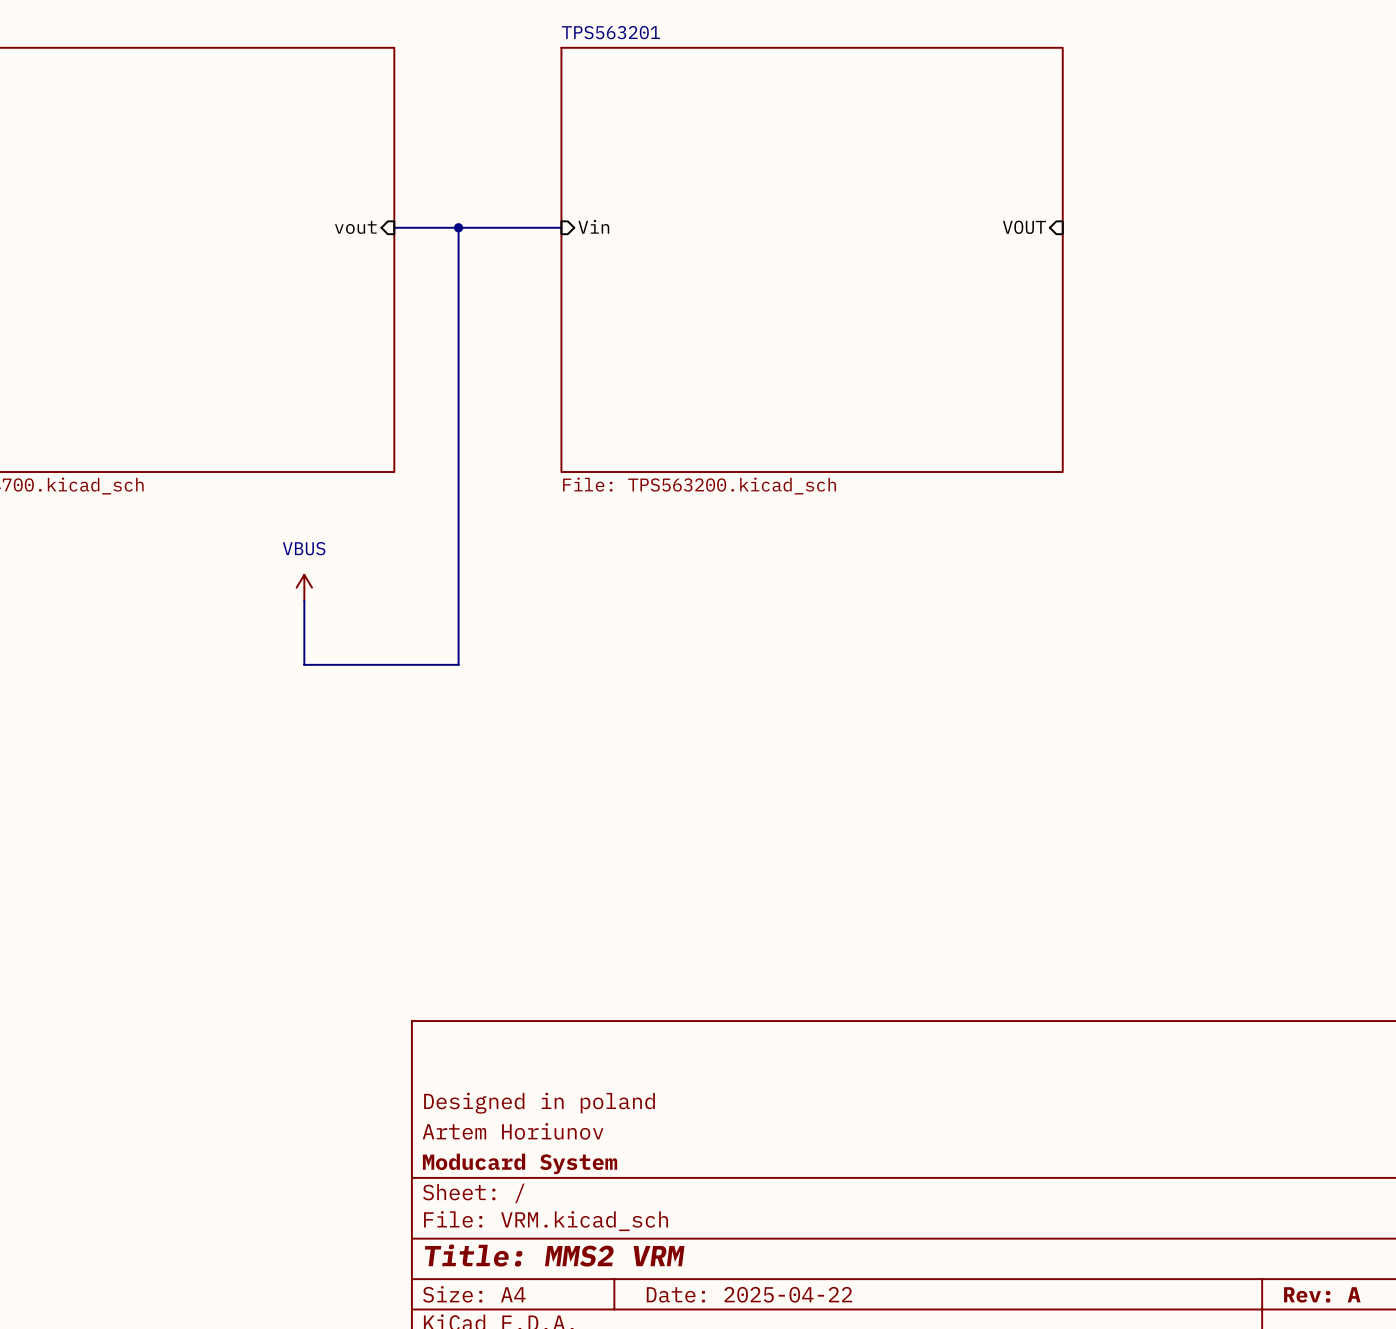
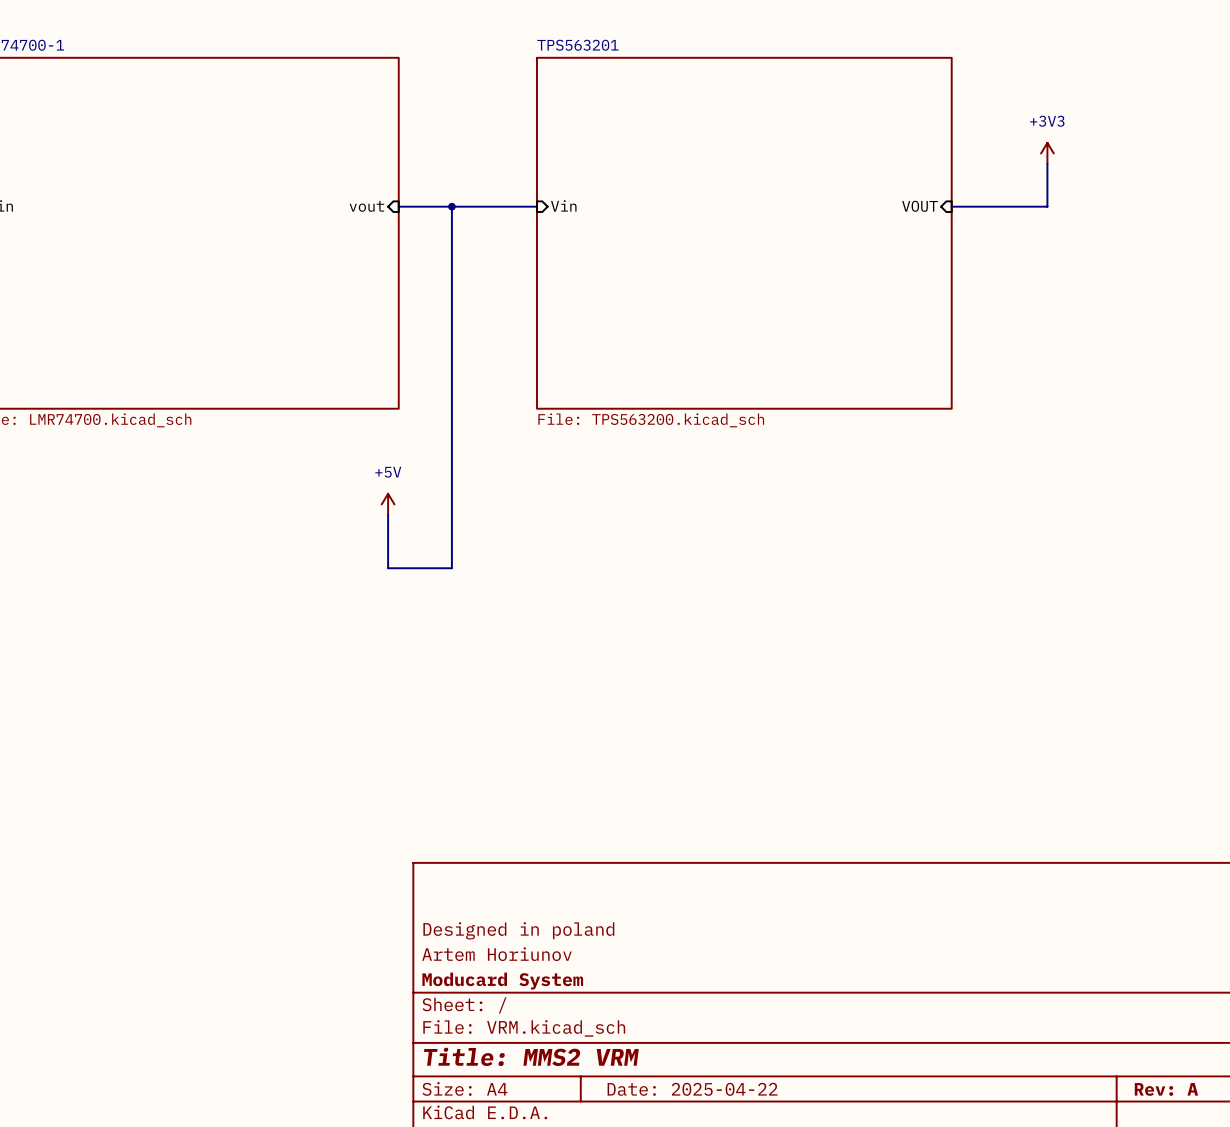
power symbol: none -> +3V3 (1047, 153)
wire: none -> (1047, 164) (1047, 206) (951, 206)
power symbol: VBUS (304, 587) -> none
power symbol: none -> +5V (388, 504)
wire: (304, 600) (304, 664) (381, 664) -> (388, 515) (388, 568)

